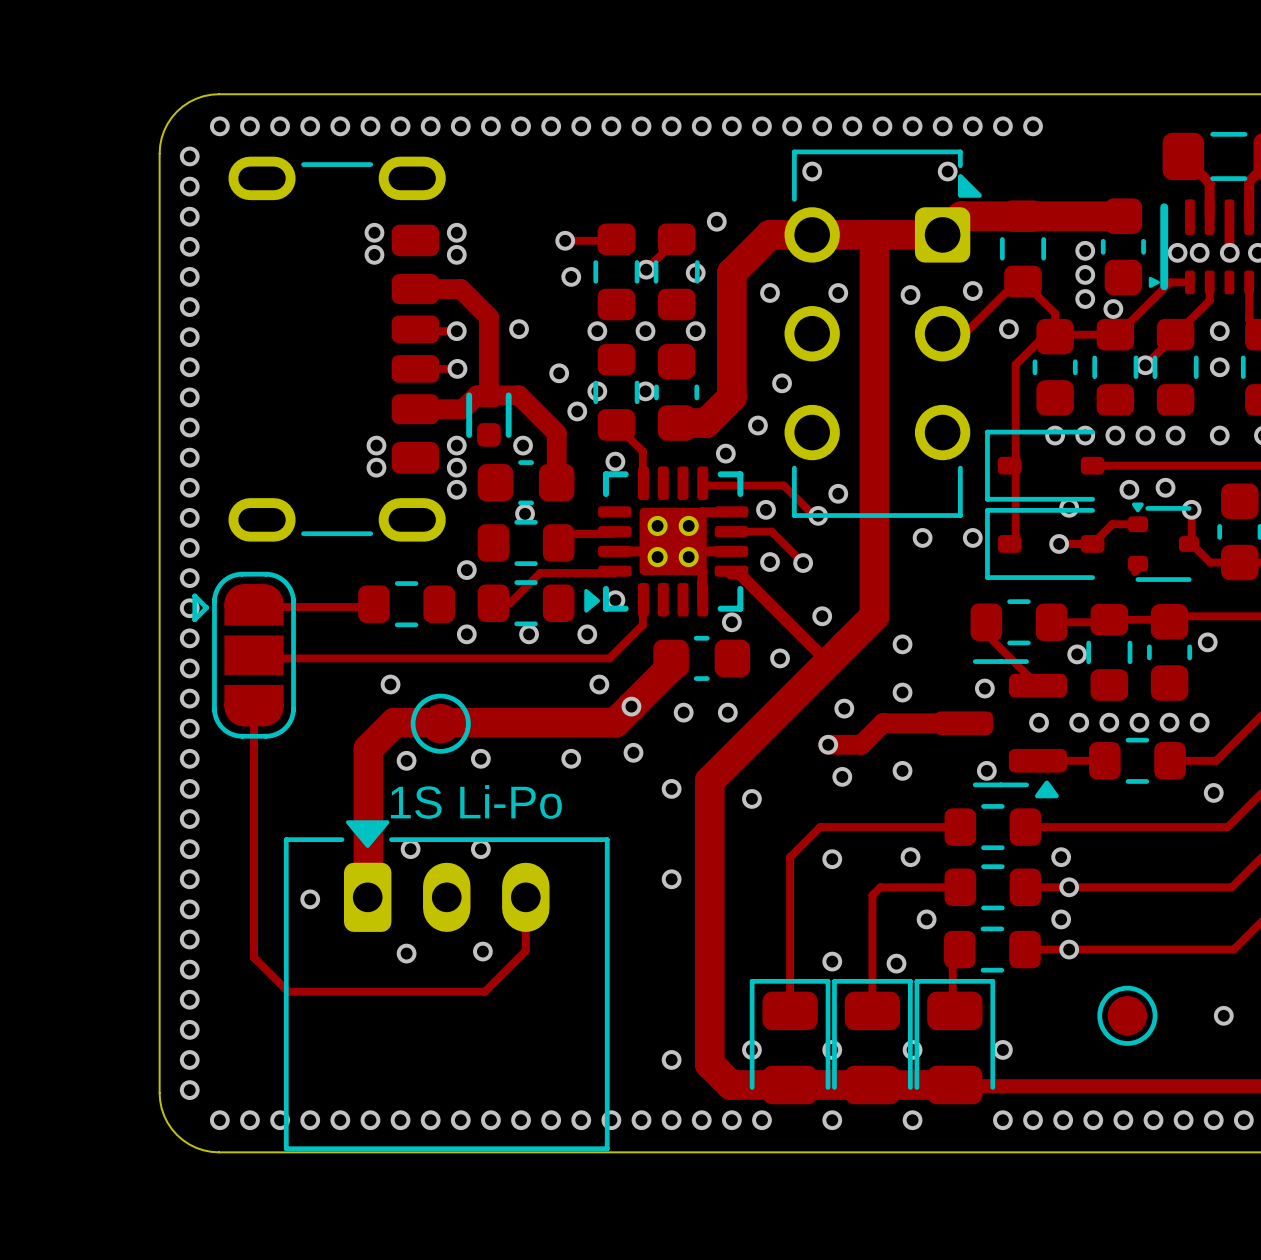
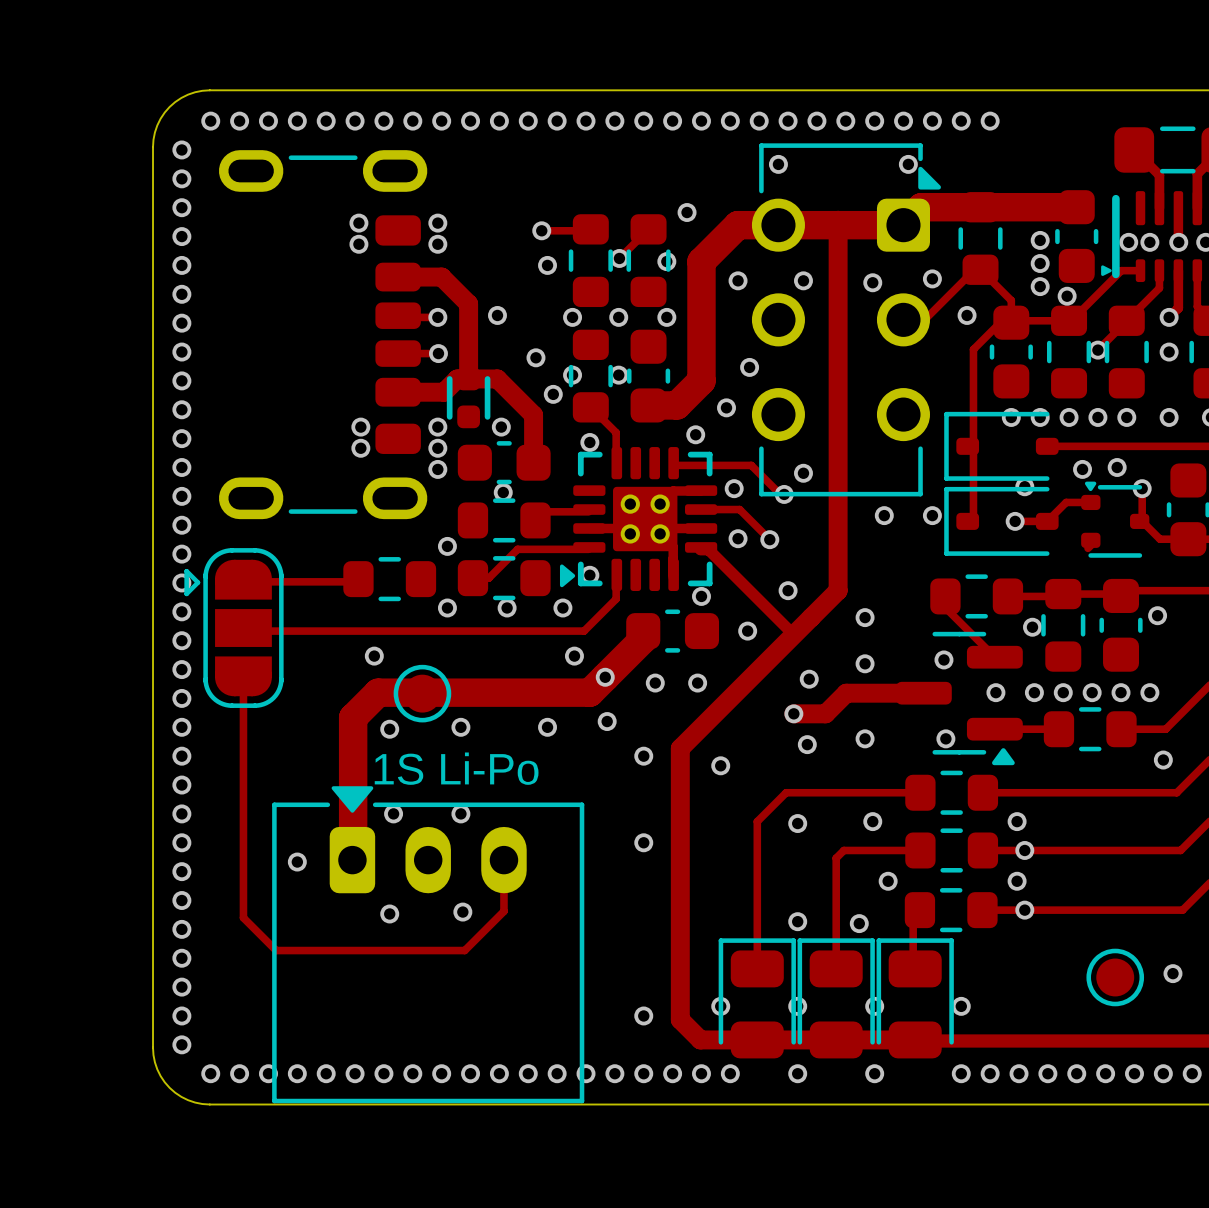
track width: thick (874, 234) (874, 616) (709, 780) (709, 1063) (730, 1084) (954, 1084) -> thin (838, 225) (838, 590) (680, 748) (680, 1019) (700, 1039) (915, 1039)
track: none -> (1178, 270) (1178, 308) (1169, 317)
part position: (1127, 1015) -> (1115, 977)

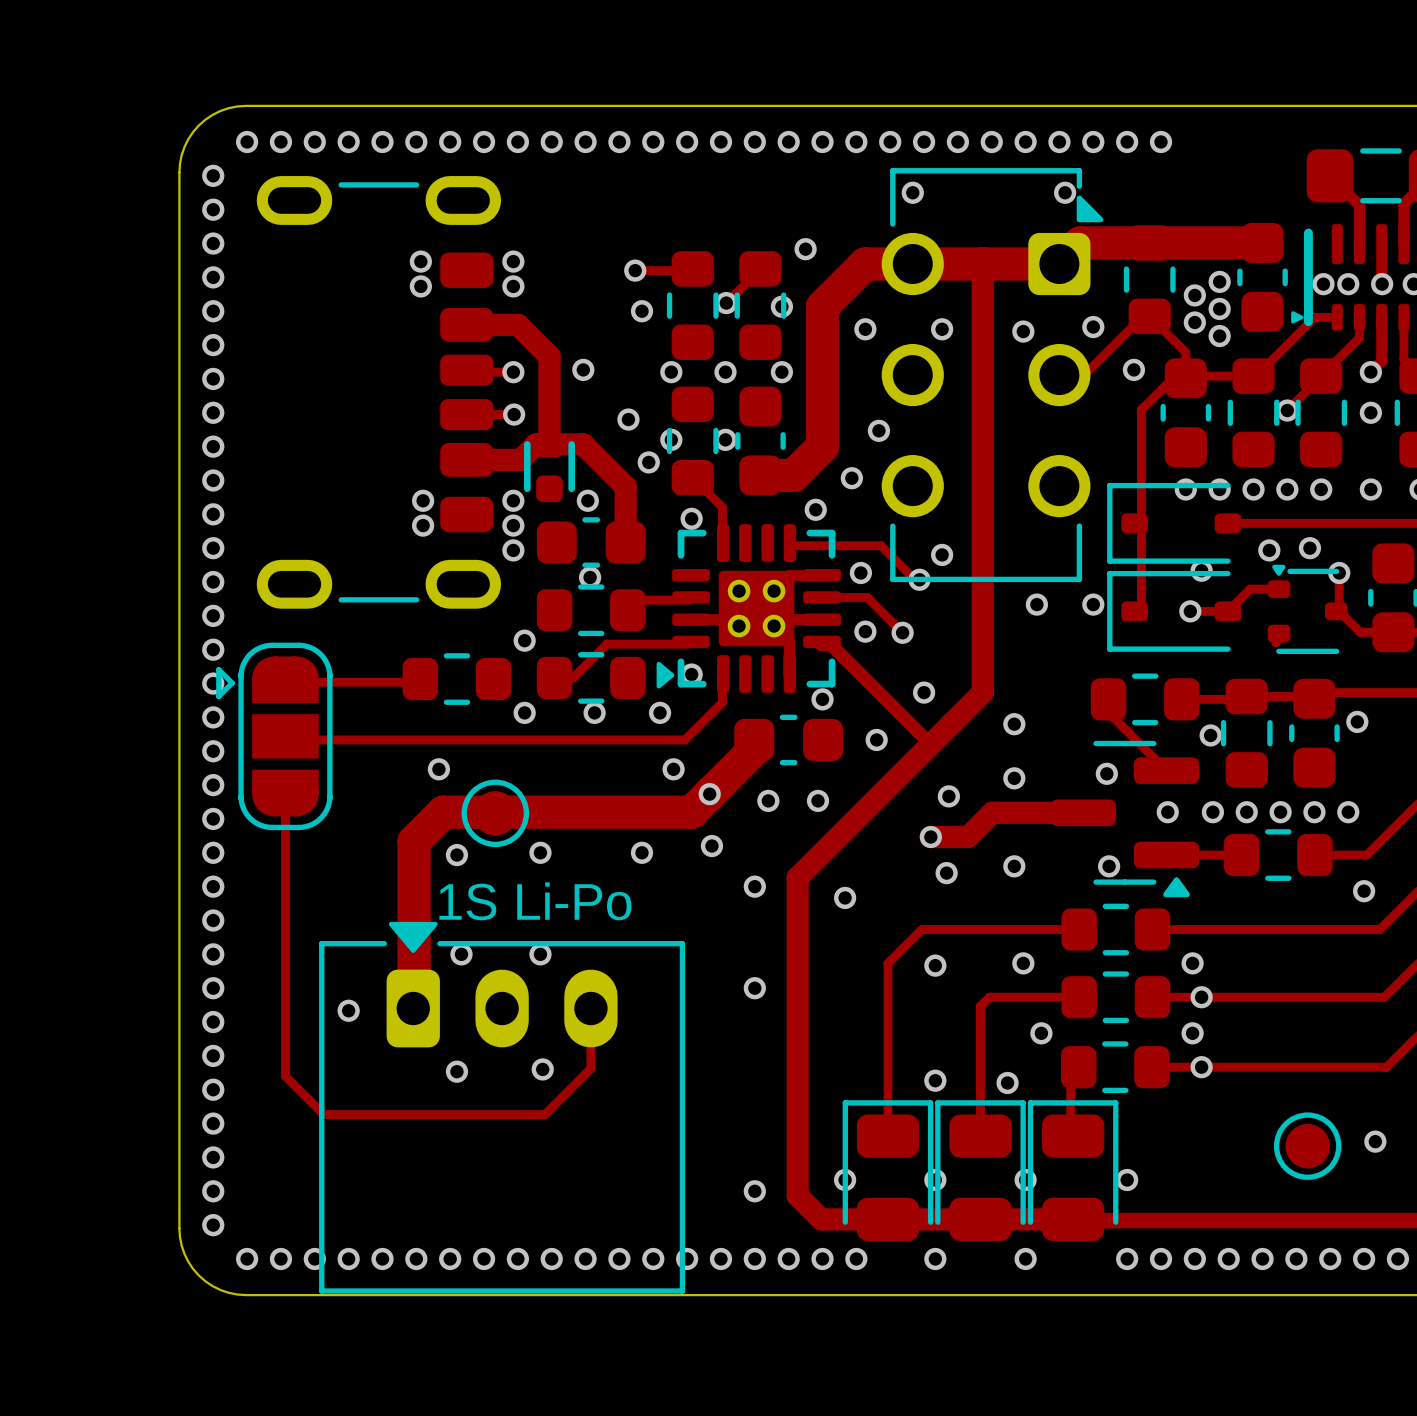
via: none -> (1194, 295)
via: none -> (1194, 322)
via: (1067, 296) -> none

